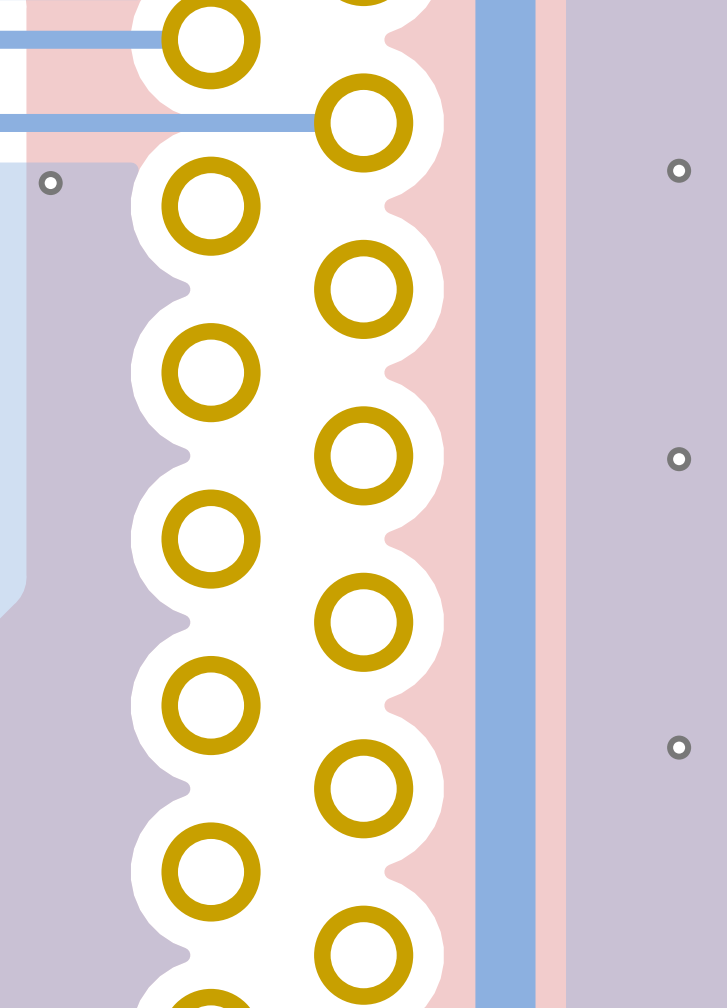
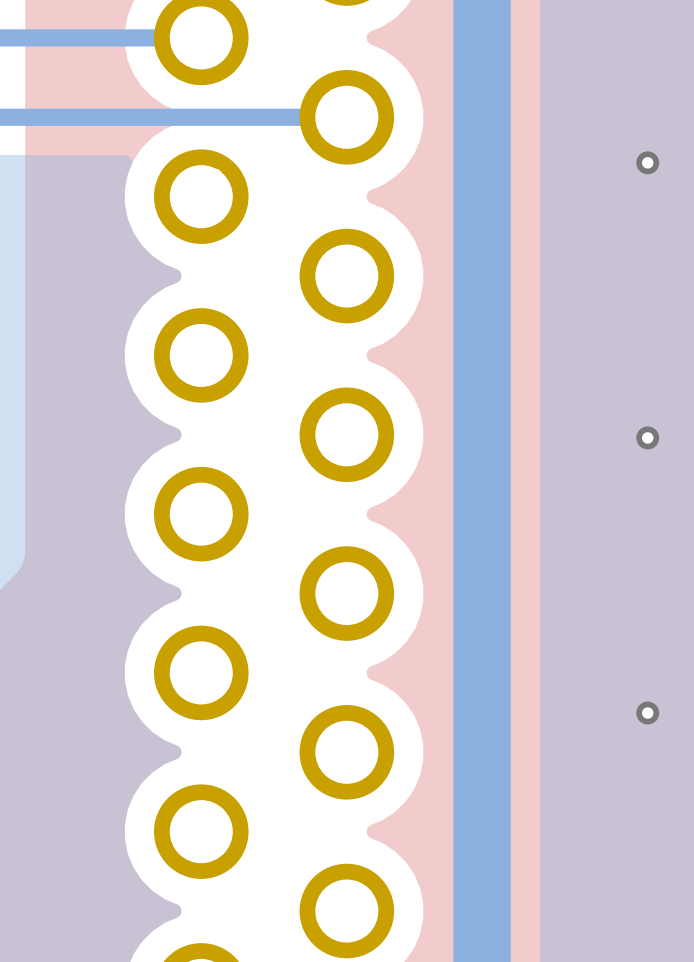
via: (50, 183) -> none

